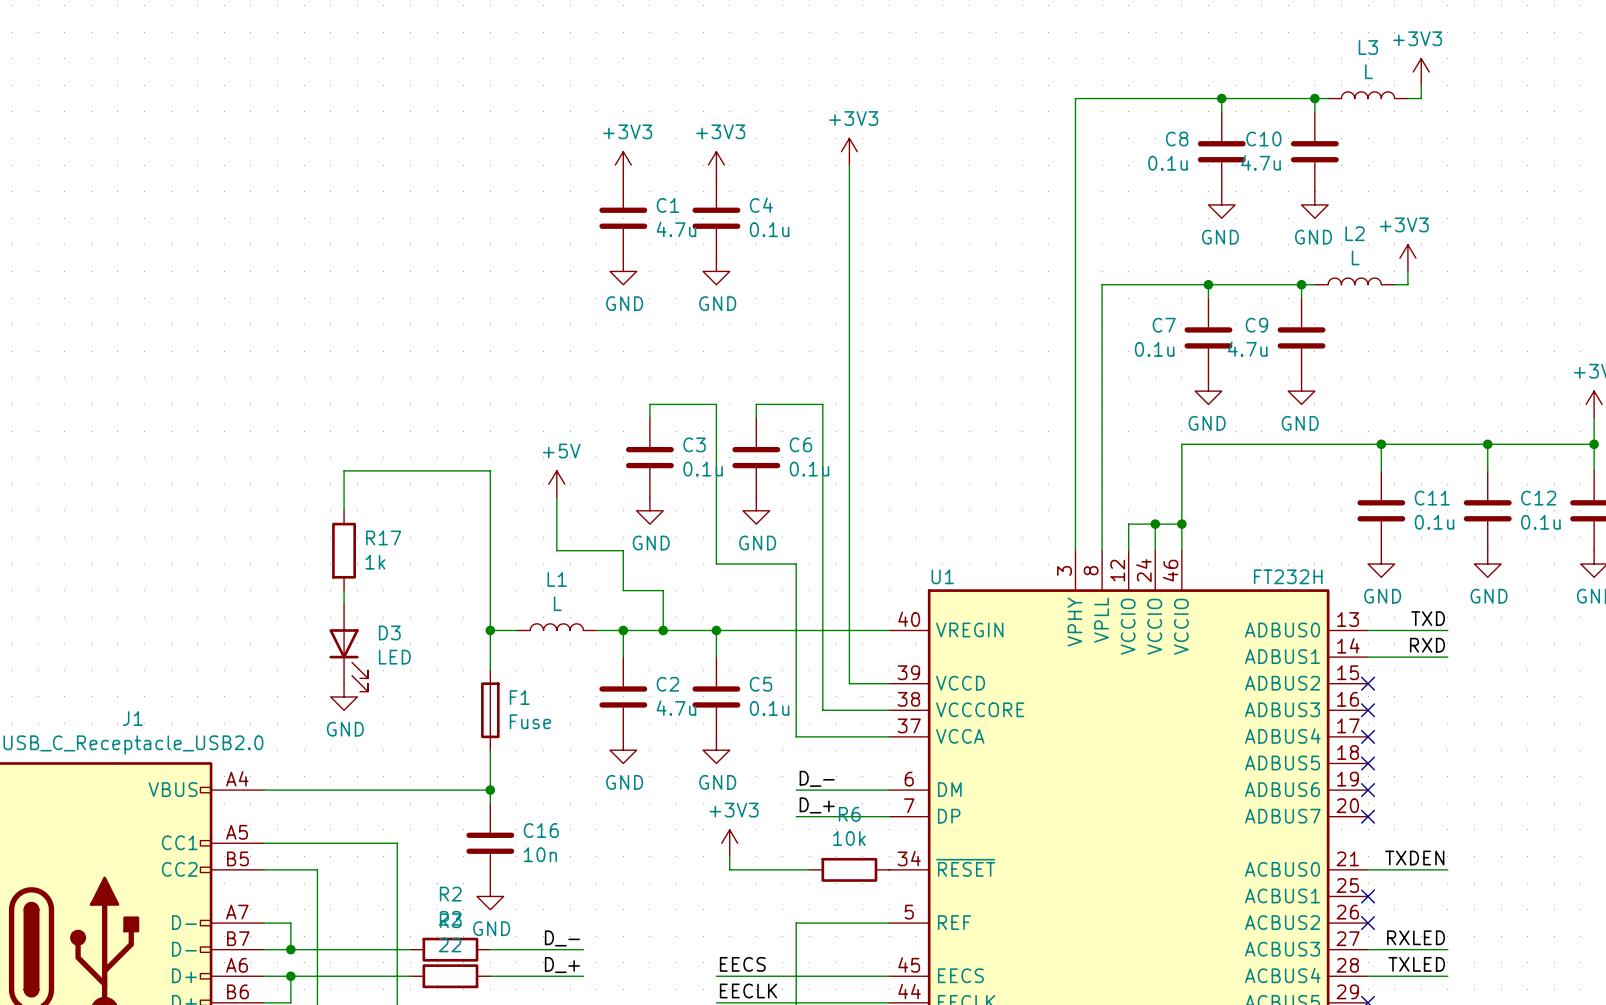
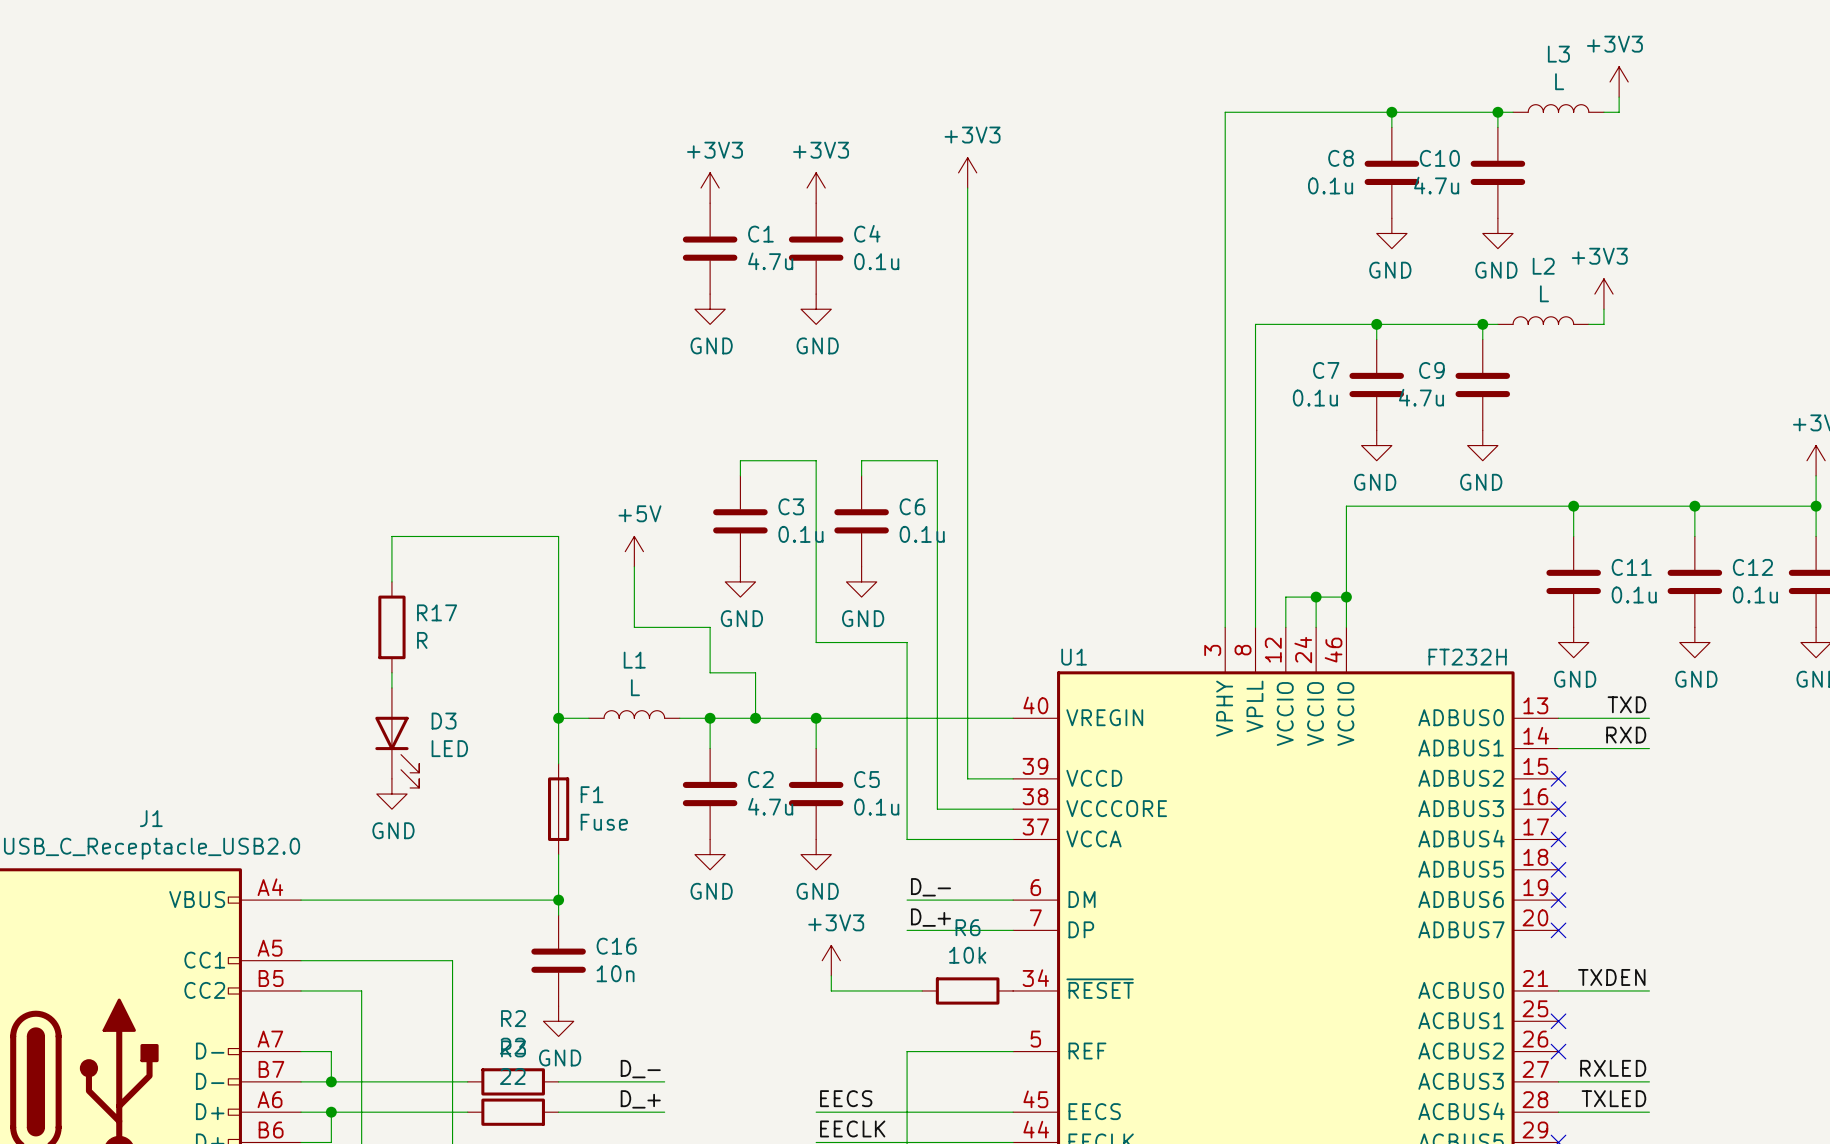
R17 value: 1k (375, 562) -> R (422, 640)

